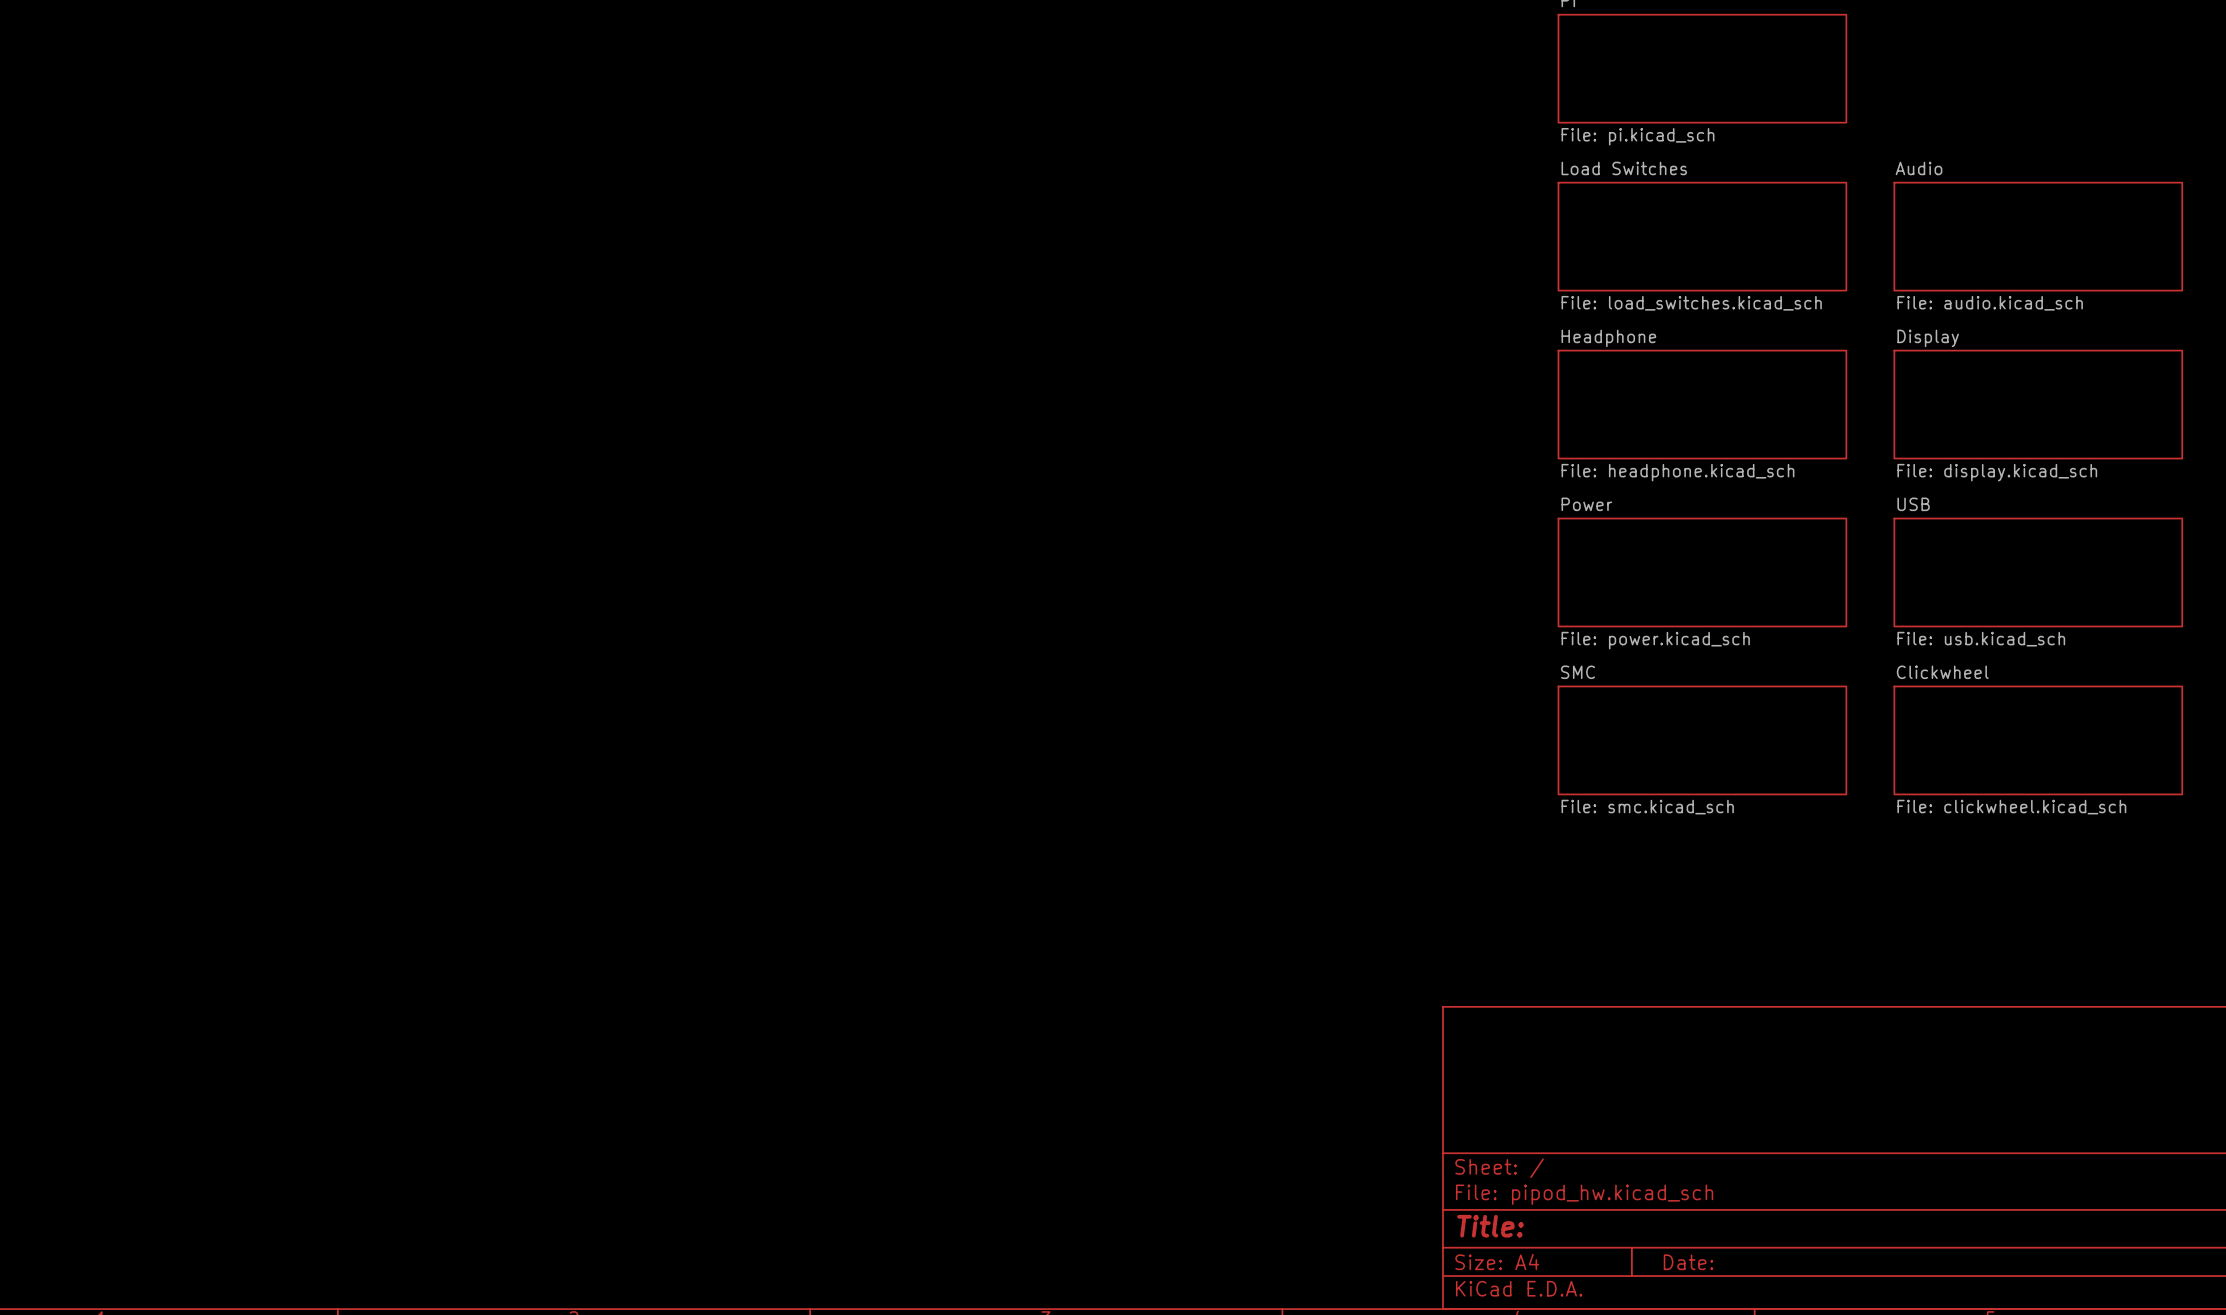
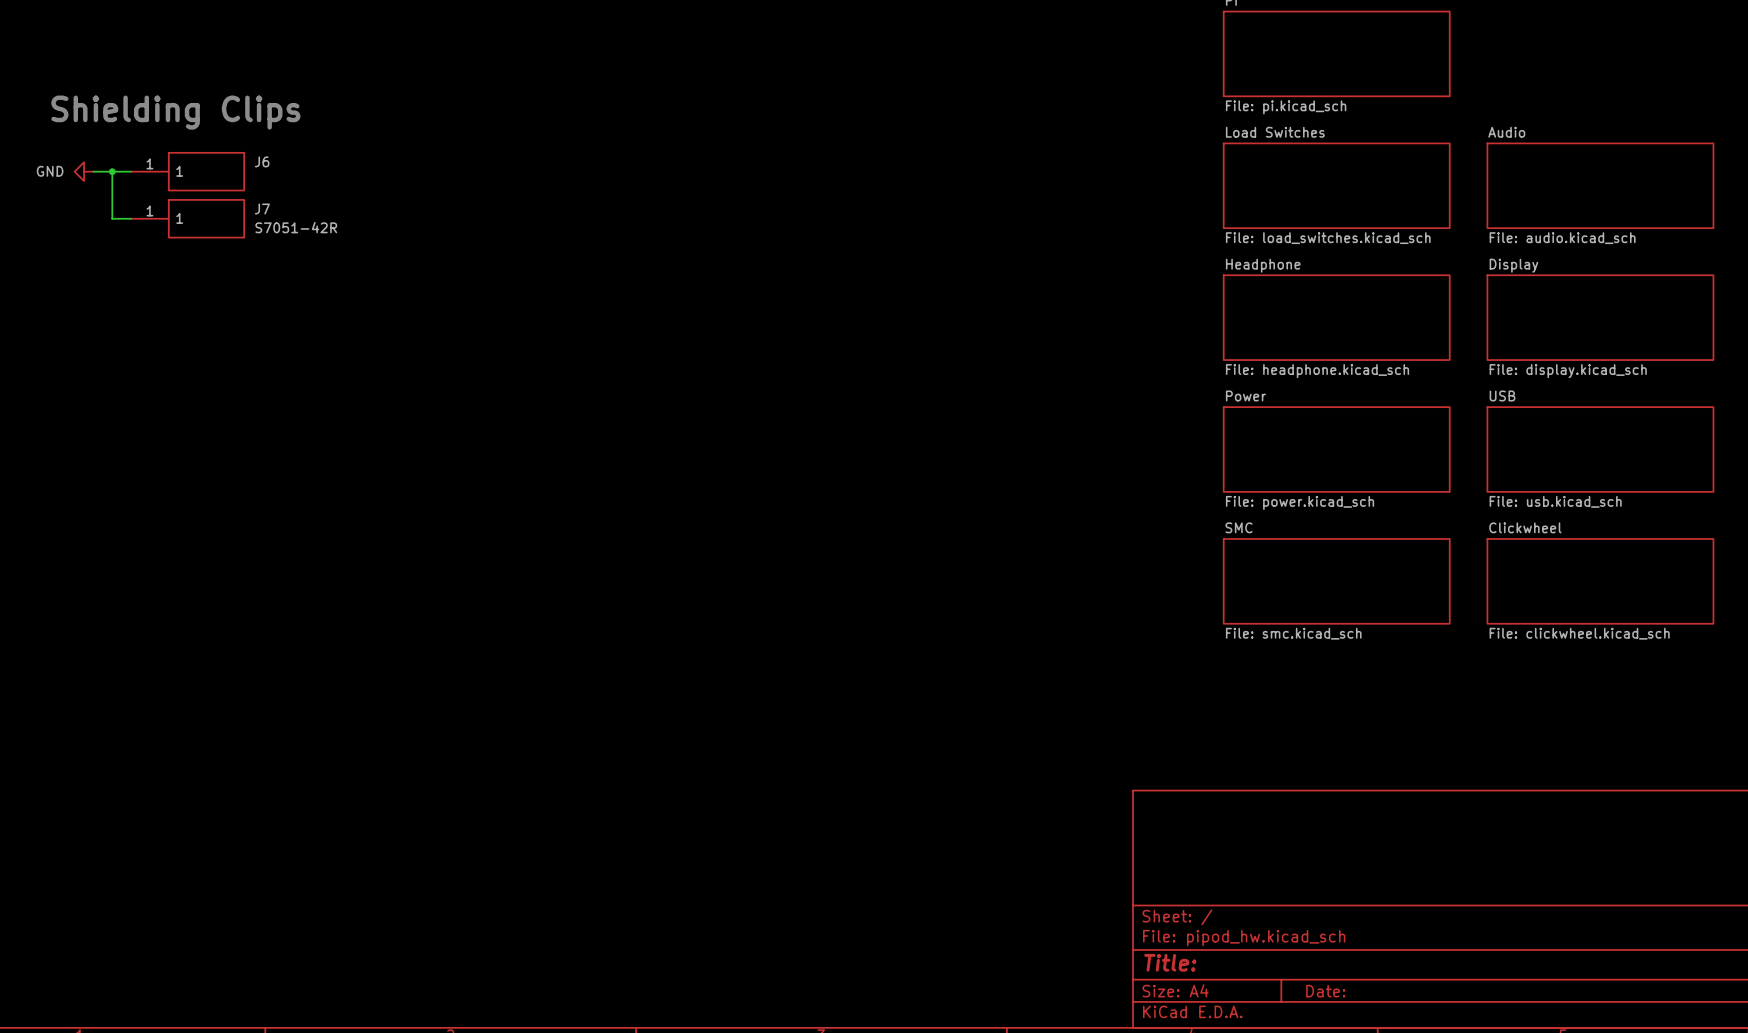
text: none -> Shielding Clips (175, 112)
power symbol: none -> GND (84, 171)
wire: none -> (93, 171) (131, 171)
wire: none -> (112, 171) (112, 218) (131, 218)
junction: none -> (112, 171)
J6: none -> (187, 171)
J7: none -> S7051-42R (187, 218)

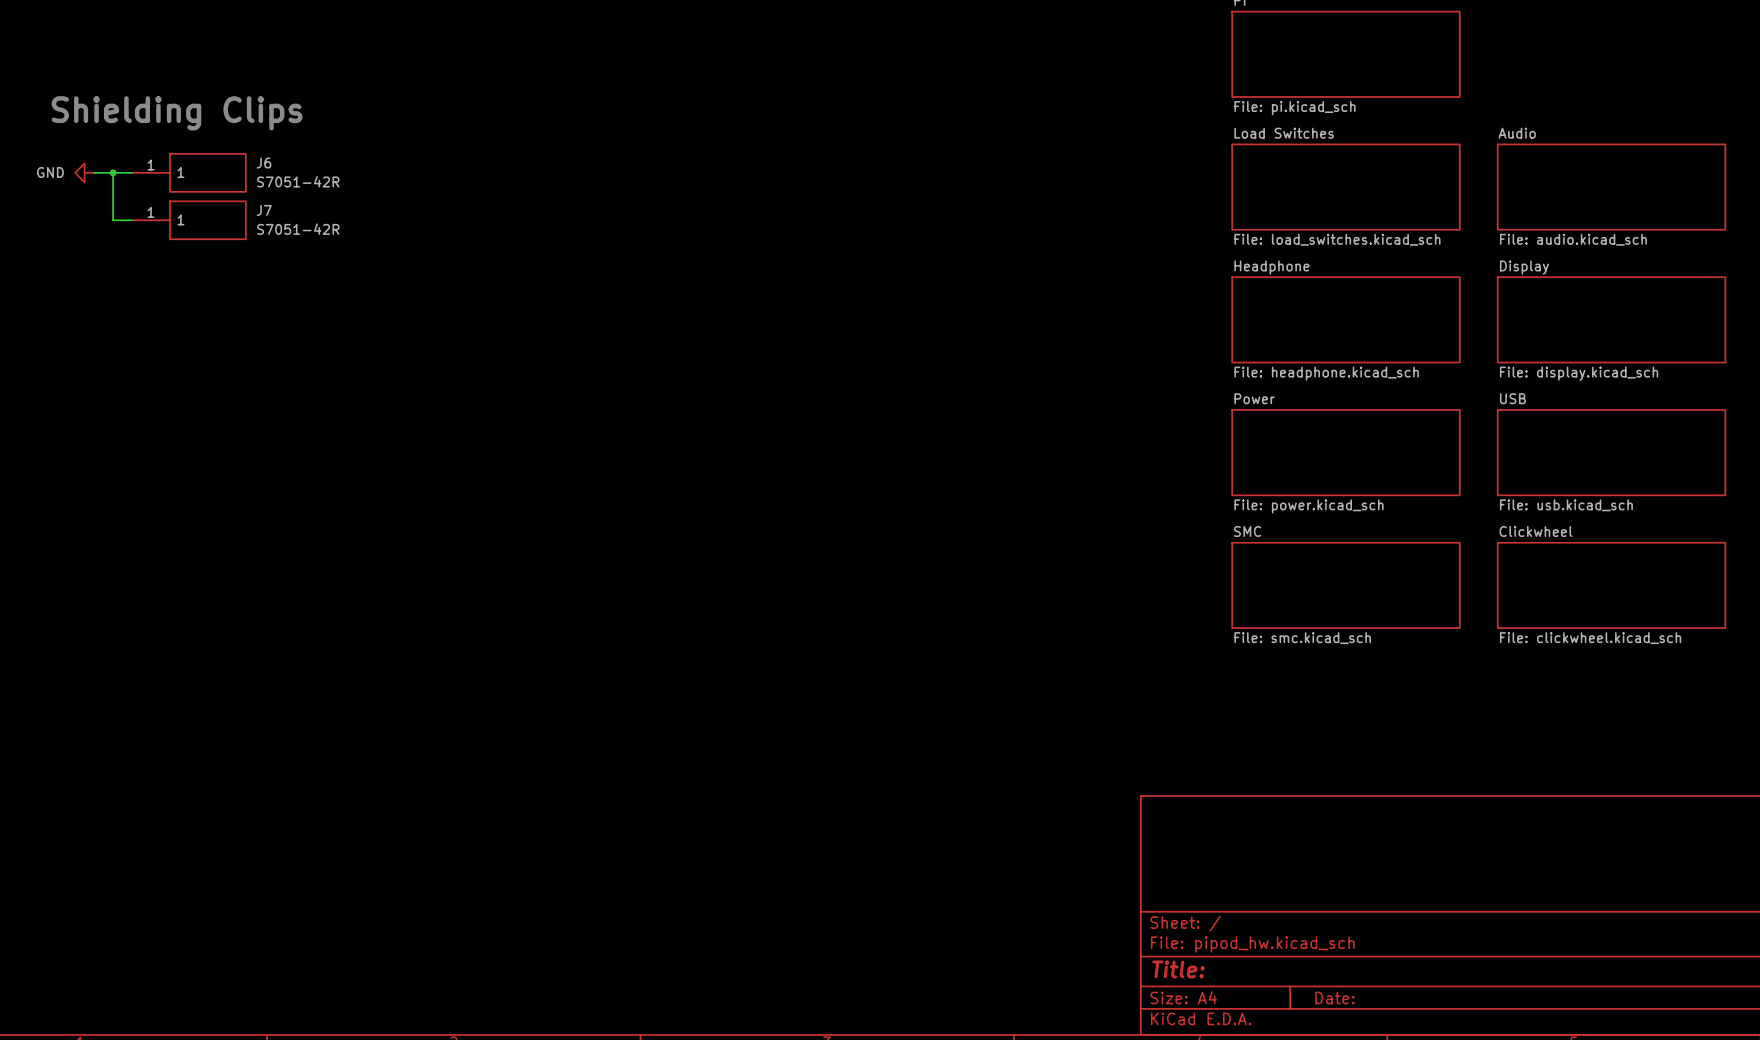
J6 value: none -> S7051-42R (298, 181)

